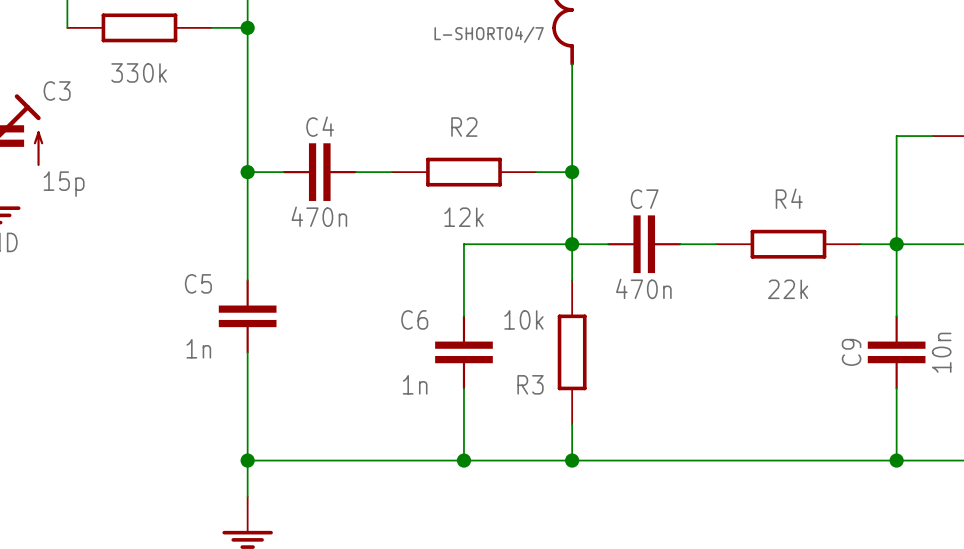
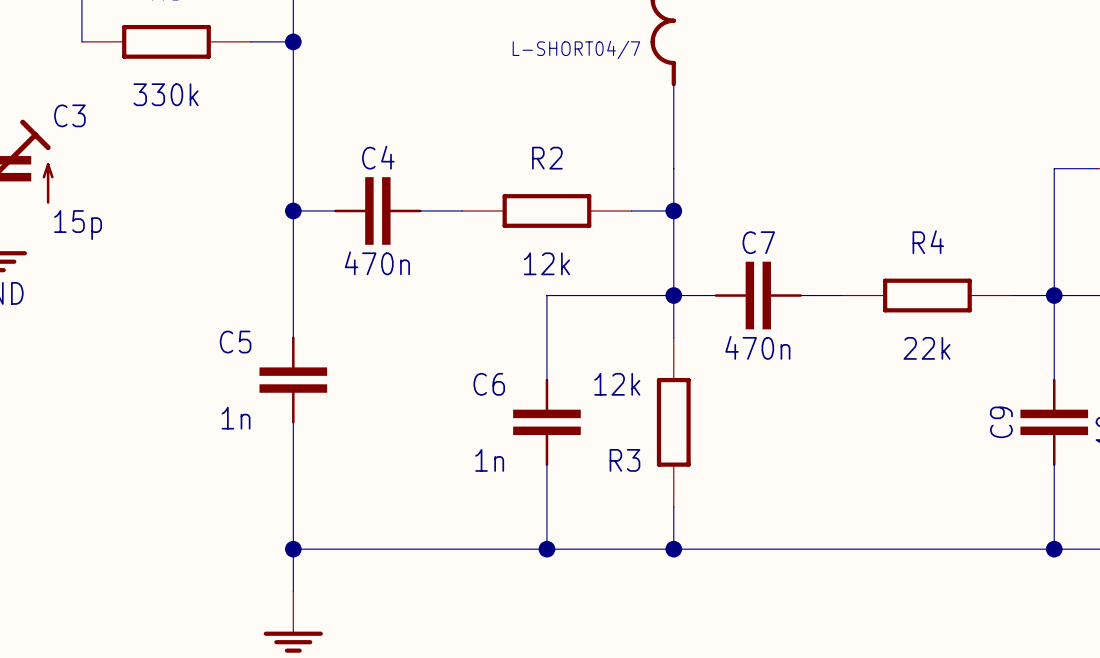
R3 value: 10k (523, 319) -> 12k (617, 384)

